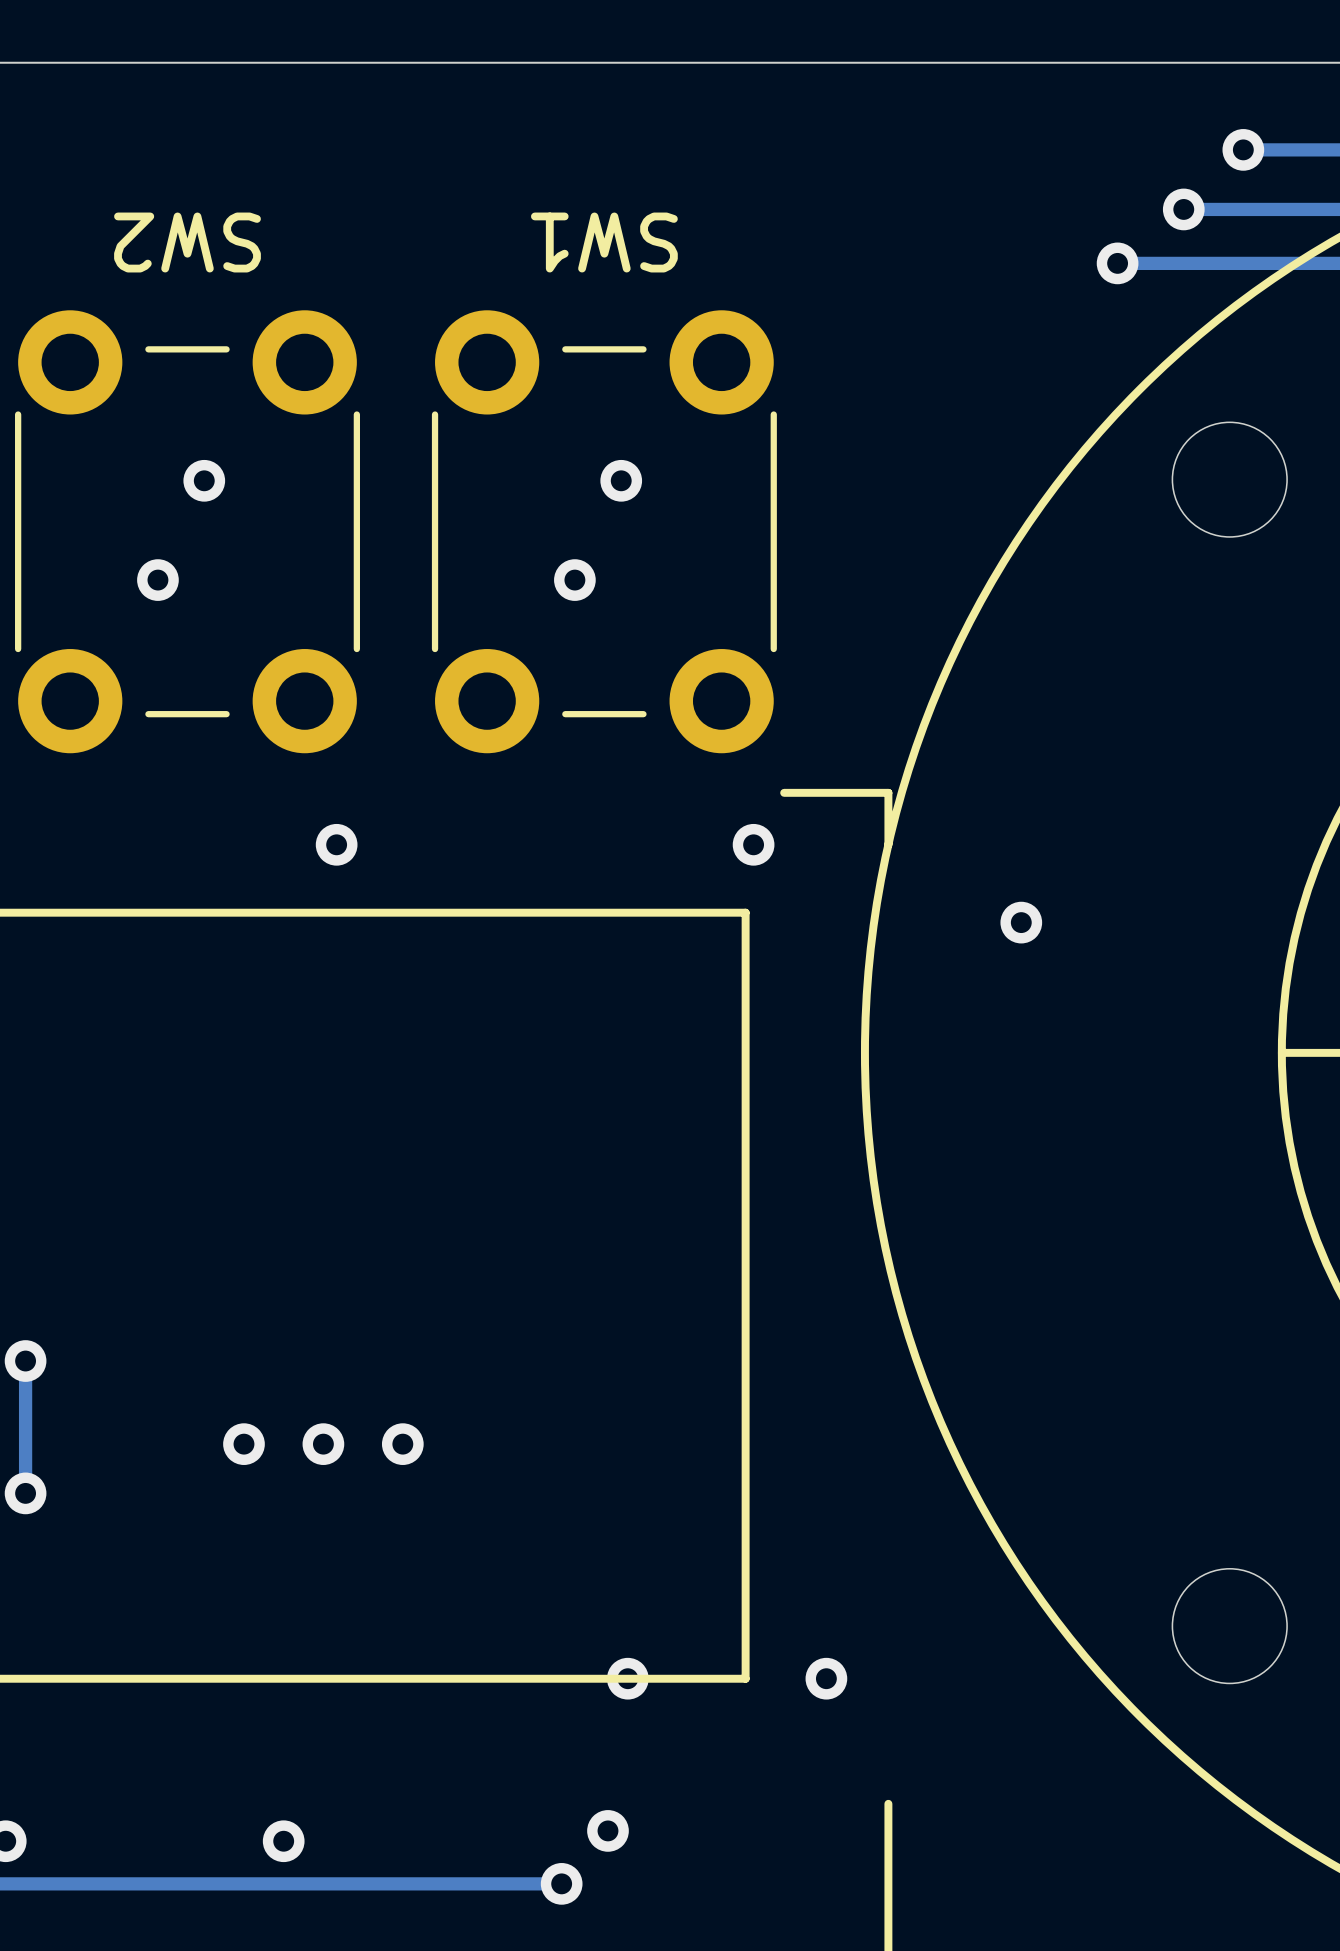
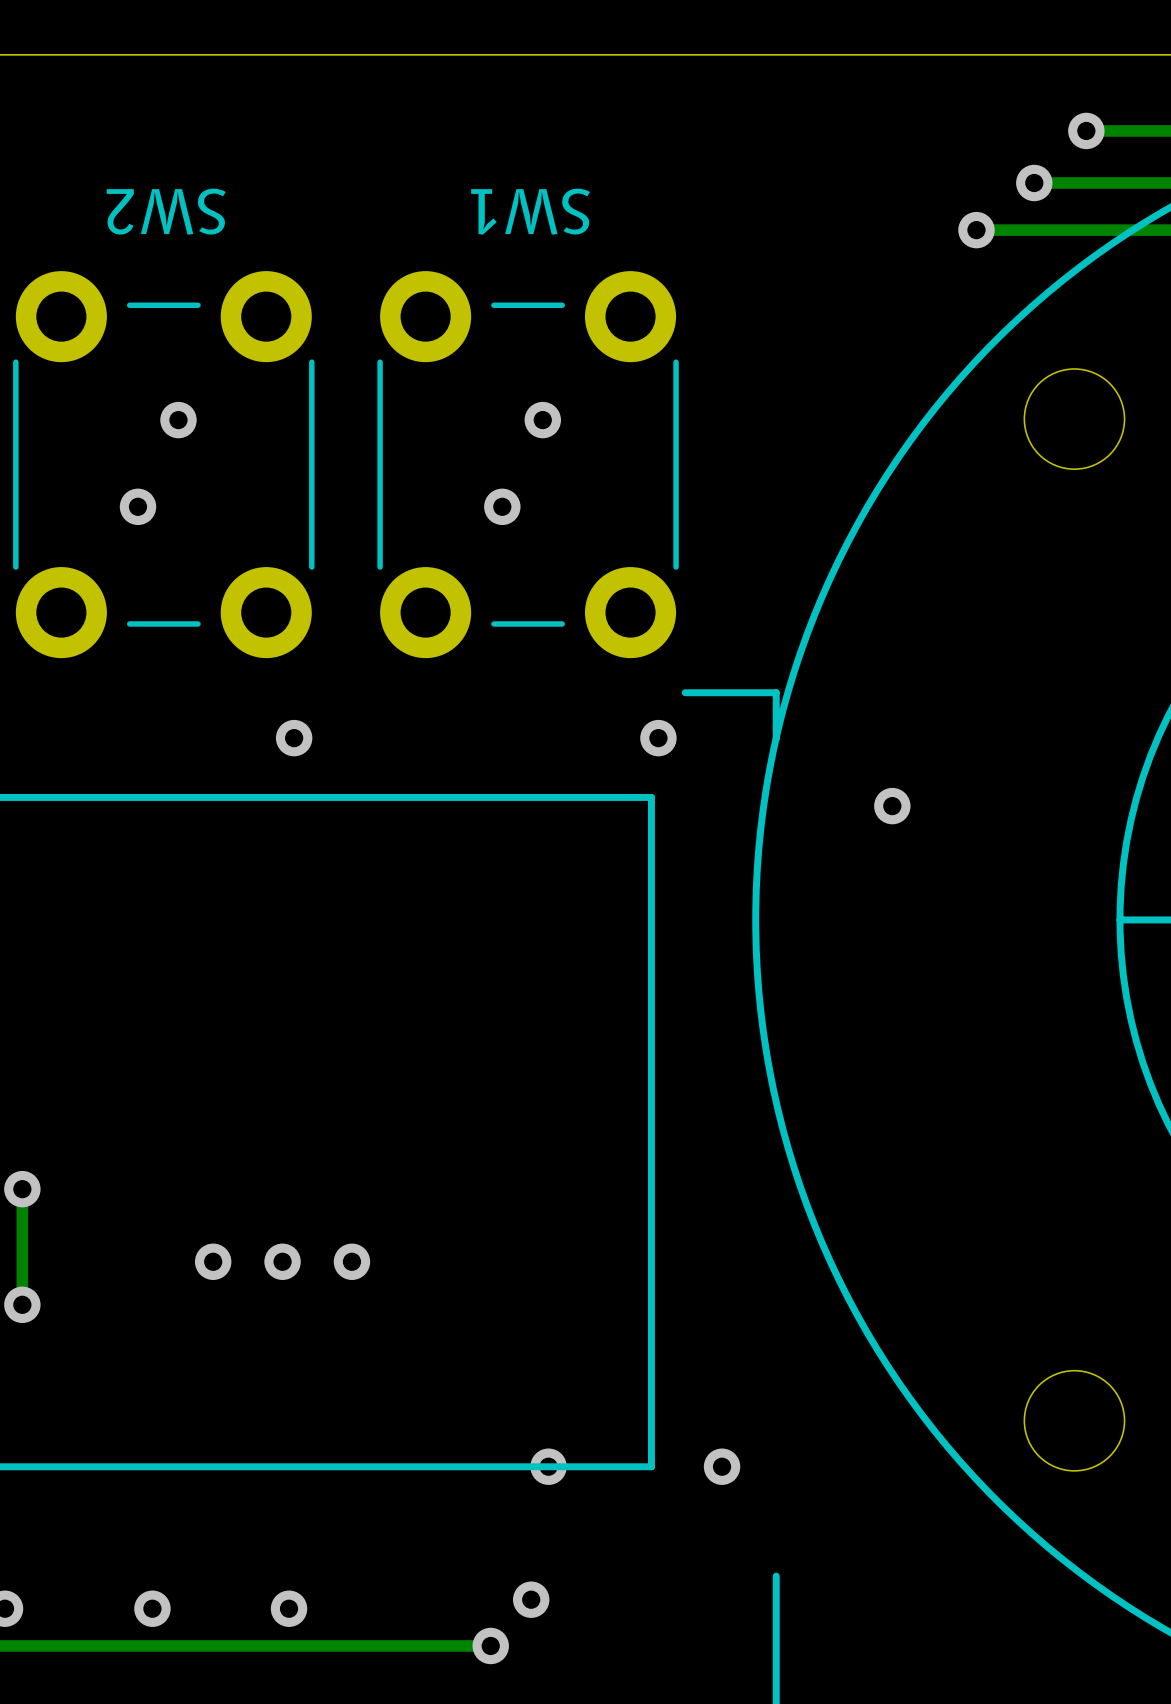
via: none -> (152, 1608)
via position: (283, 1841) -> (289, 1608)

